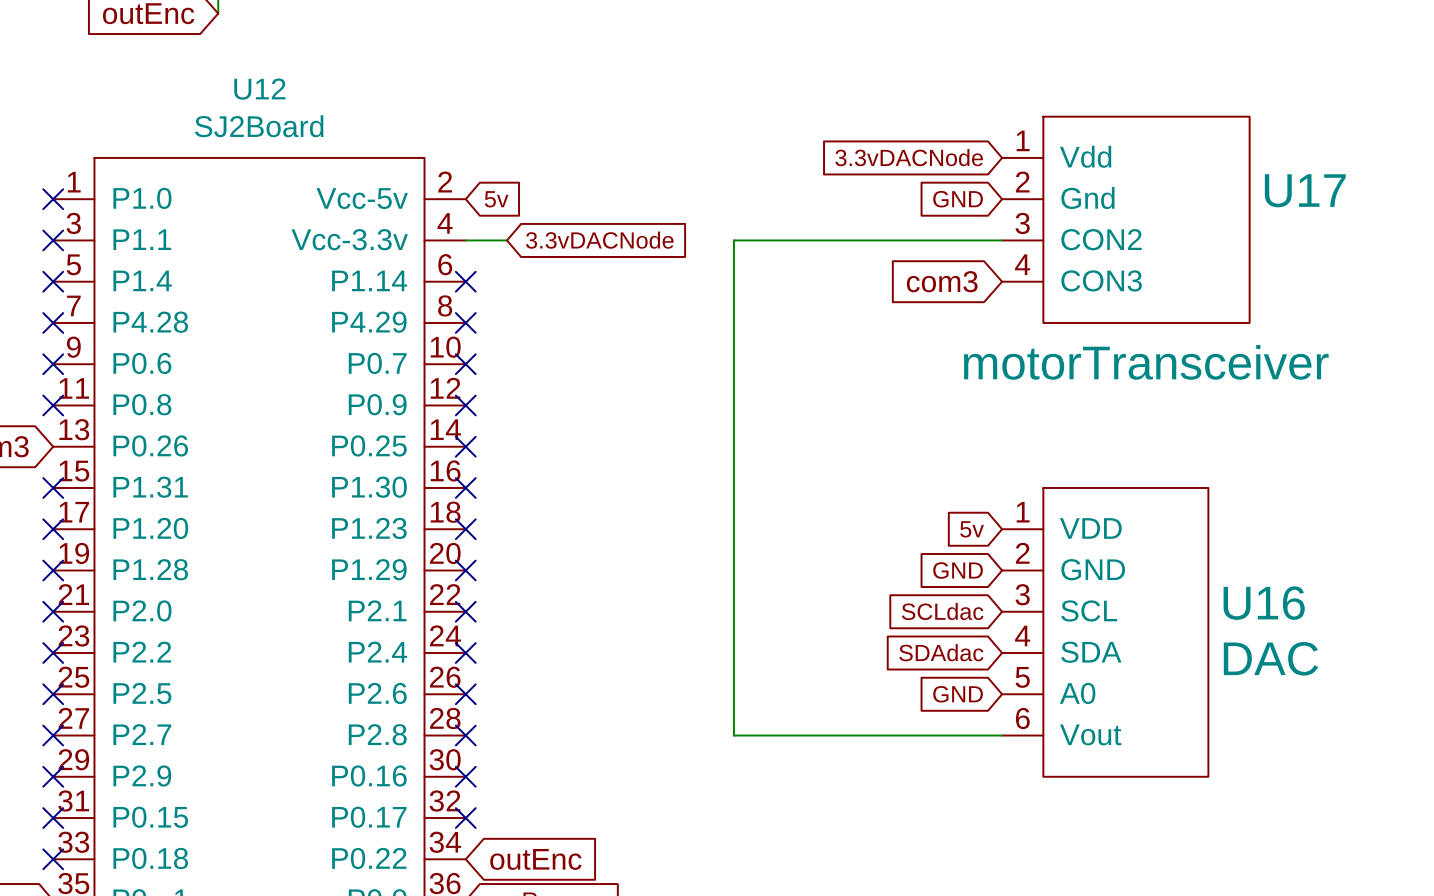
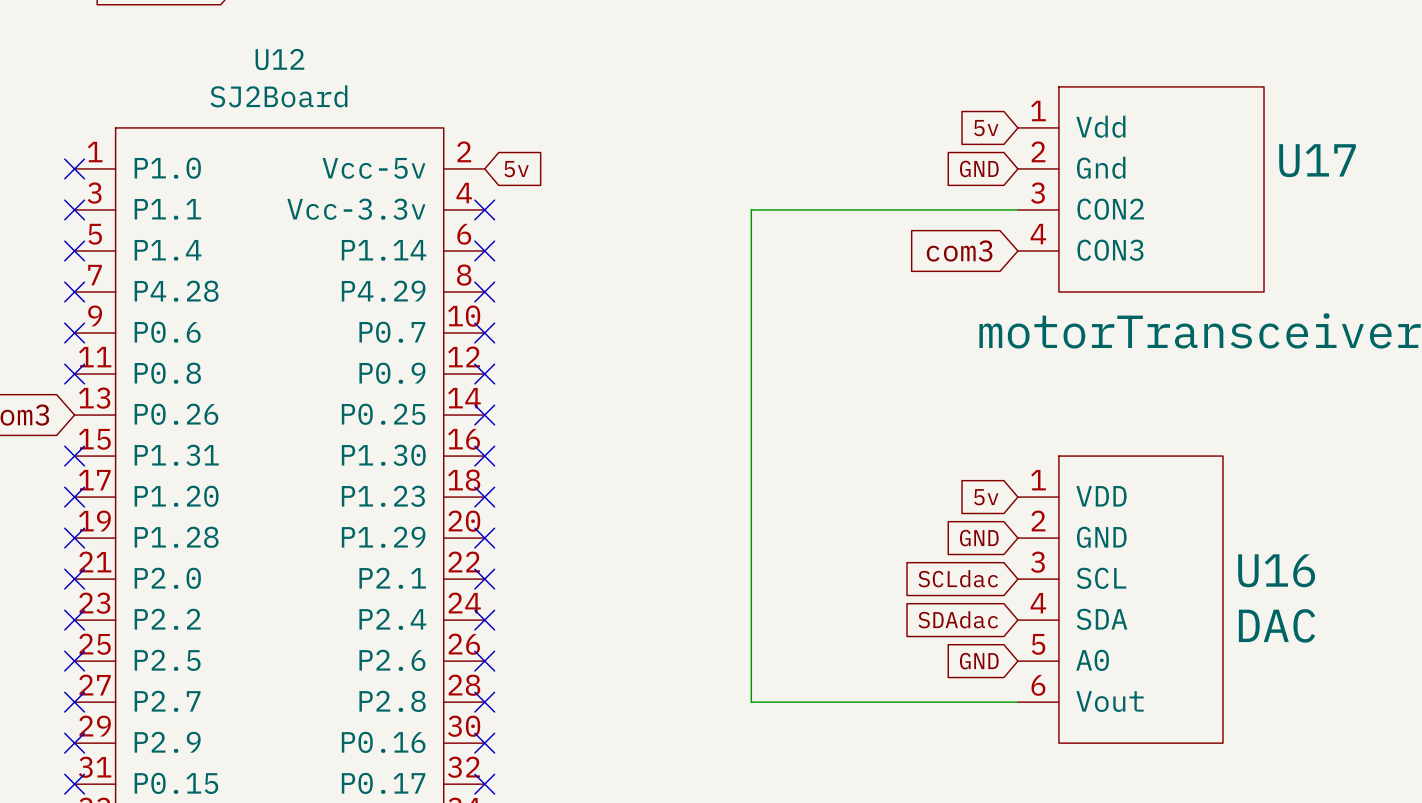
global label: 3.3vDACNode (909, 157) -> 5v (986, 128)
wire: (465, 240) (507, 240) -> none
no-connect mark: none -> (484, 209)
global label: 3.3vDACNode (599, 240) -> none

